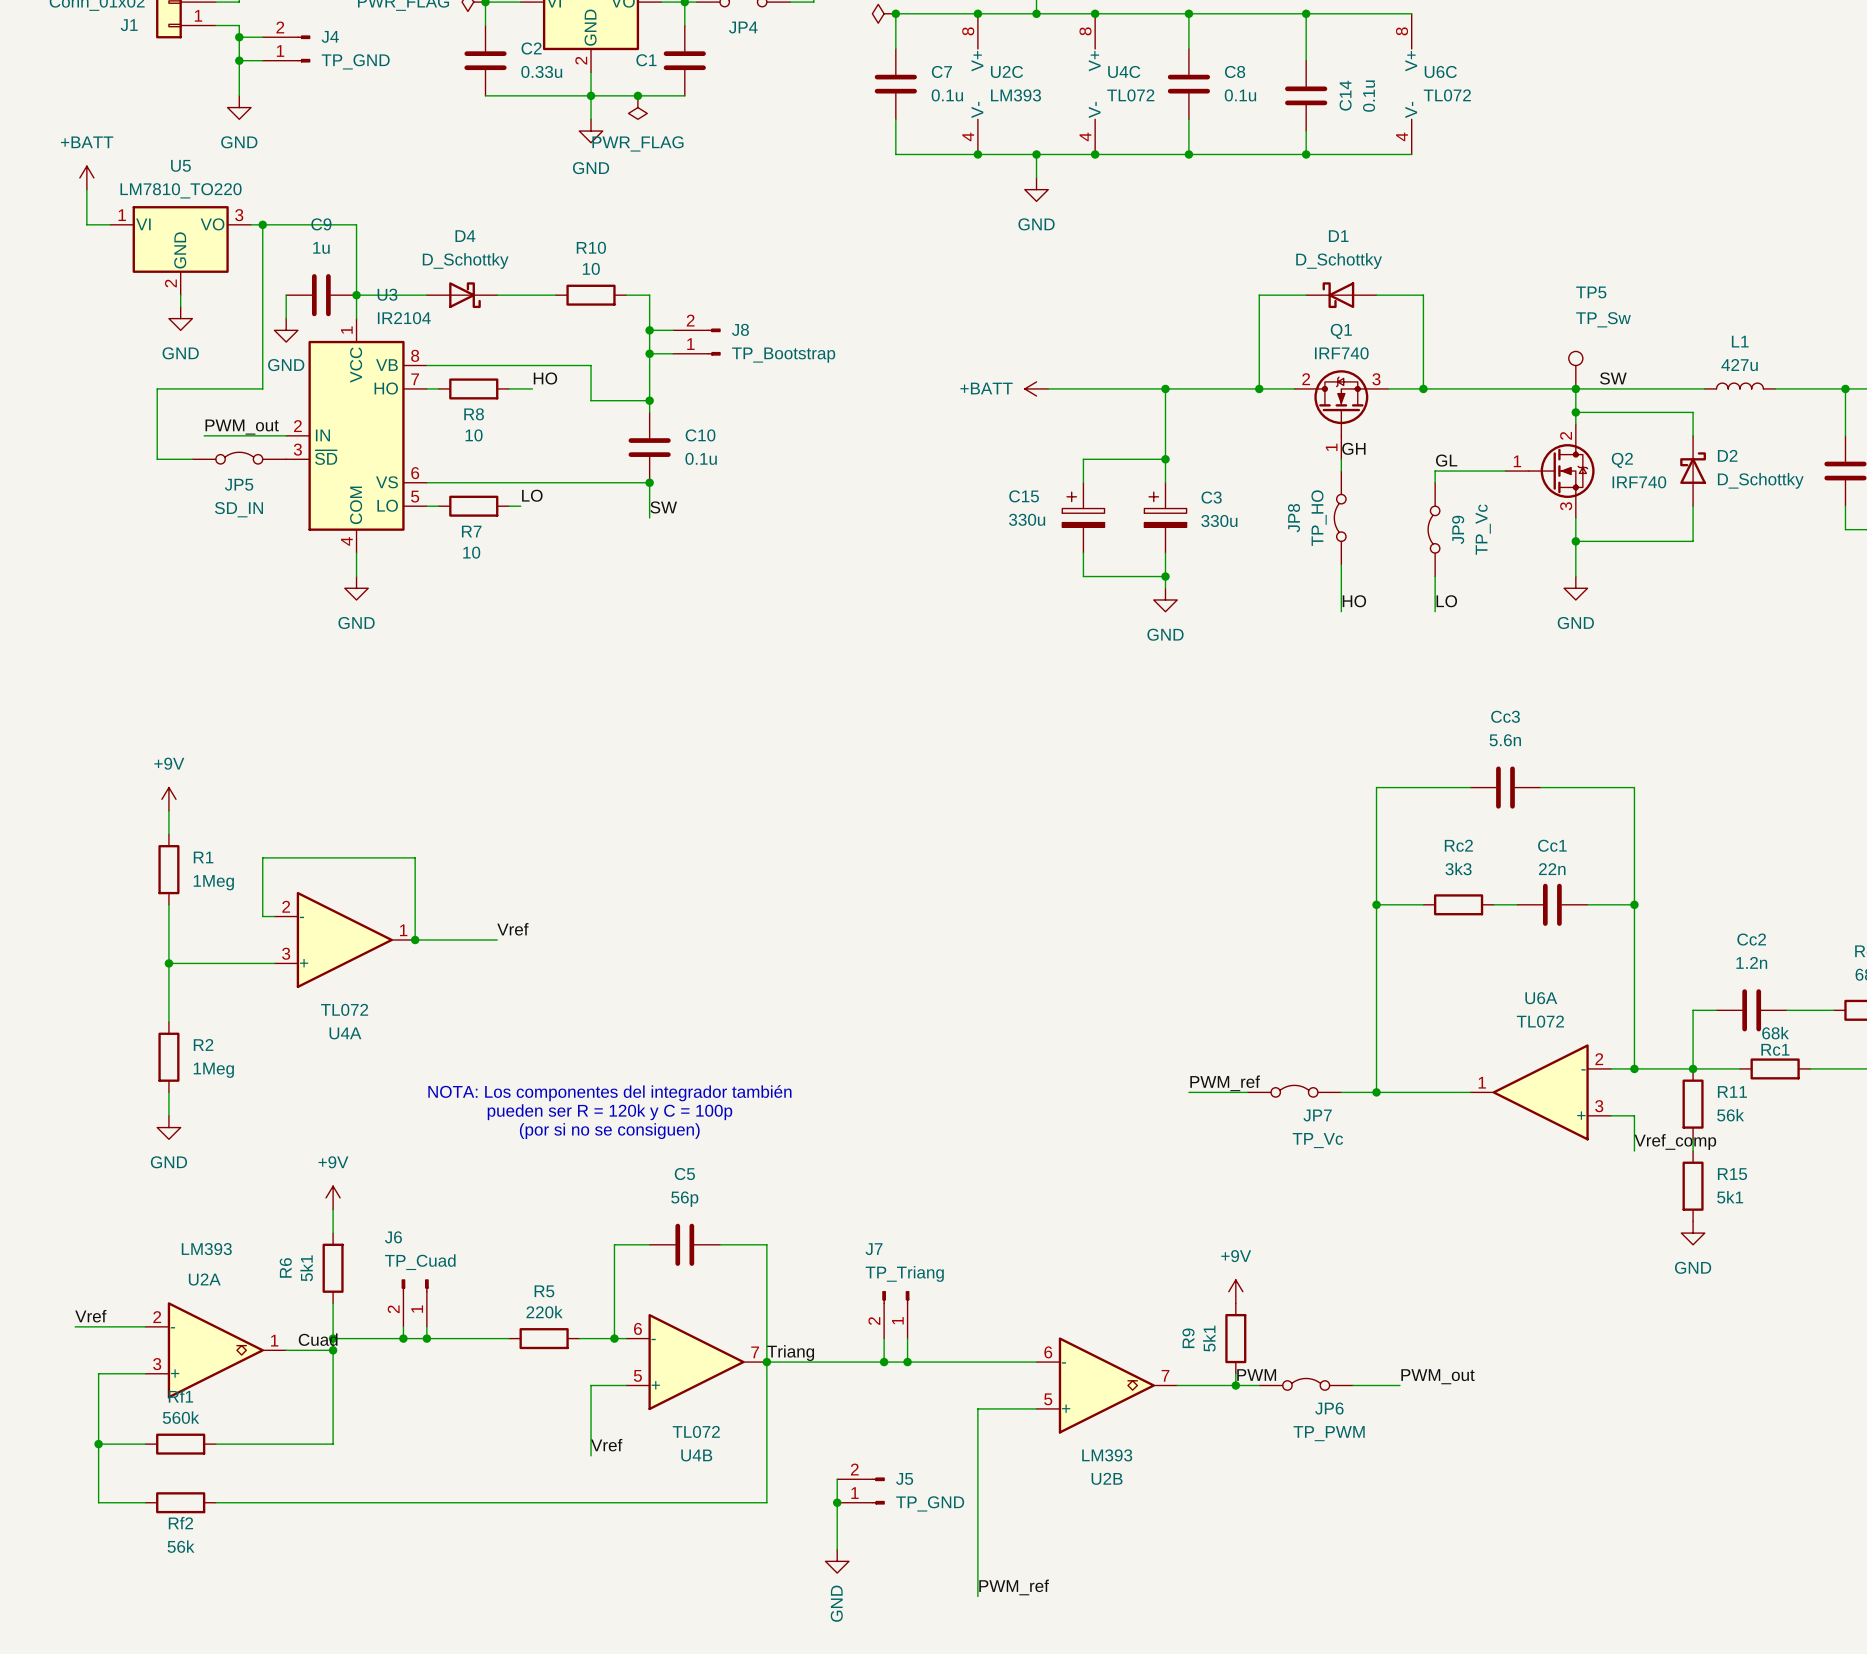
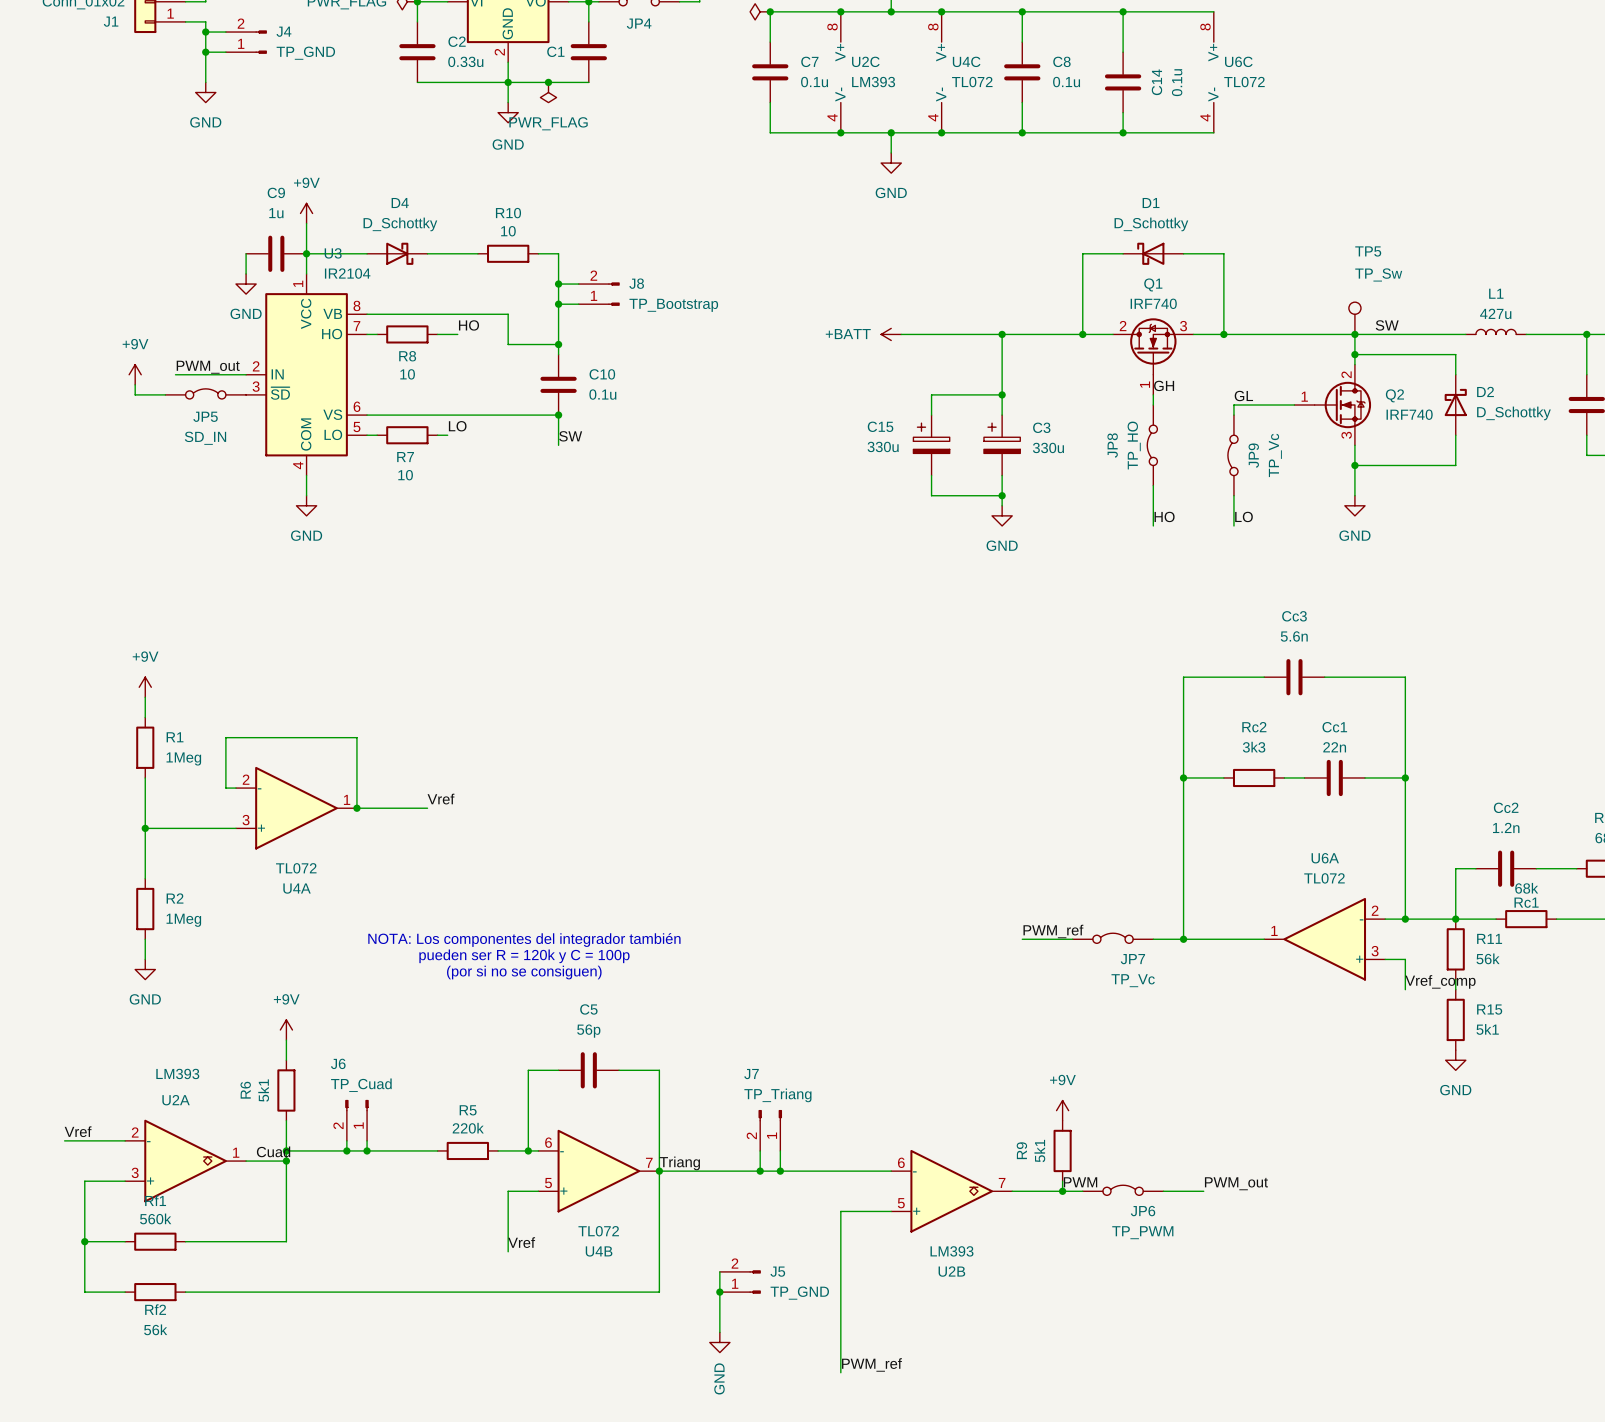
power symbol: +BATT (86, 177) -> none
wire: (86, 189) (86, 224) (110, 224) -> none
wire: (251, 224) (356, 224) (356, 259) -> none
wire: (262, 224) (262, 388) (157, 388) (157, 447) -> none
junction: (262, 224) -> none
power symbol: none -> +9V (306, 213)
U5: LM7810_TO220 (180, 250) -> none
wire: (180, 295) (180, 306) -> none
power symbol: GND (180, 318) -> none
power symbol: none -> +9V (135, 374)

